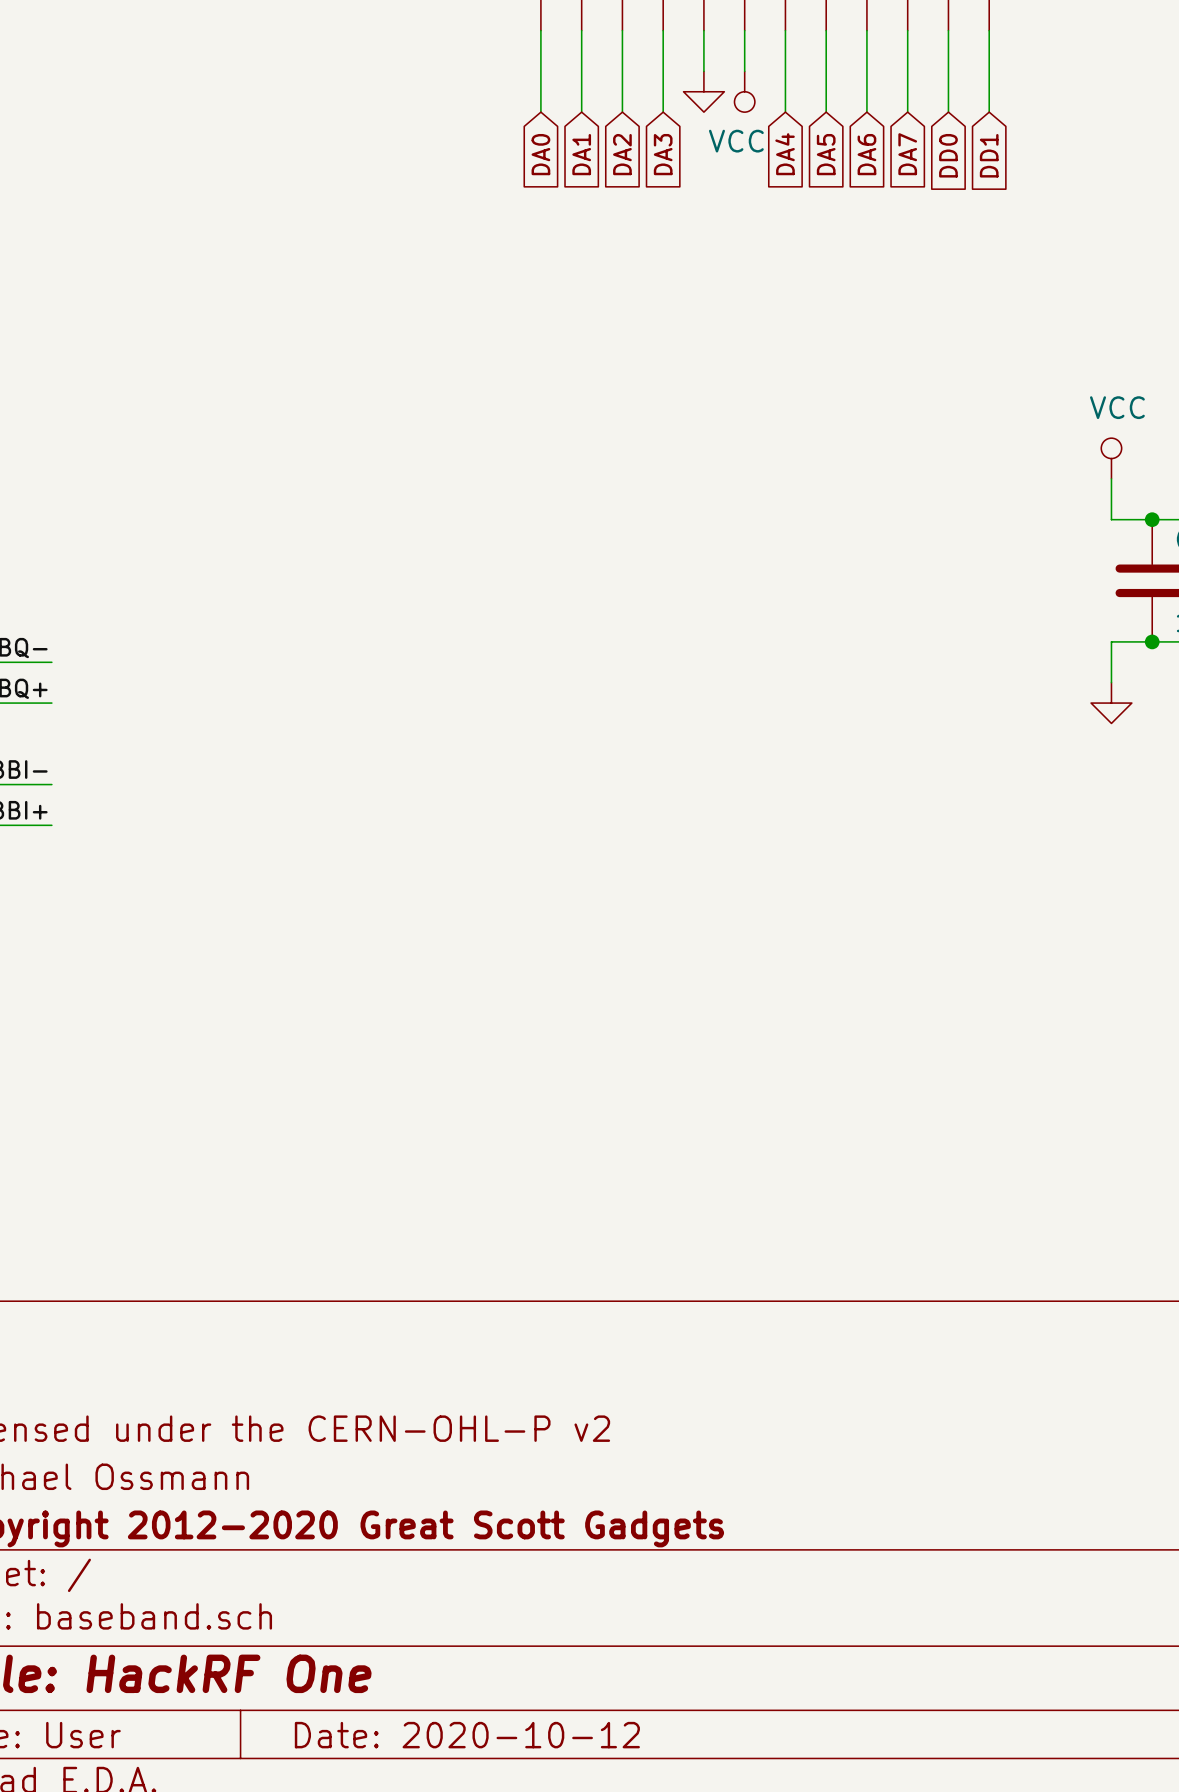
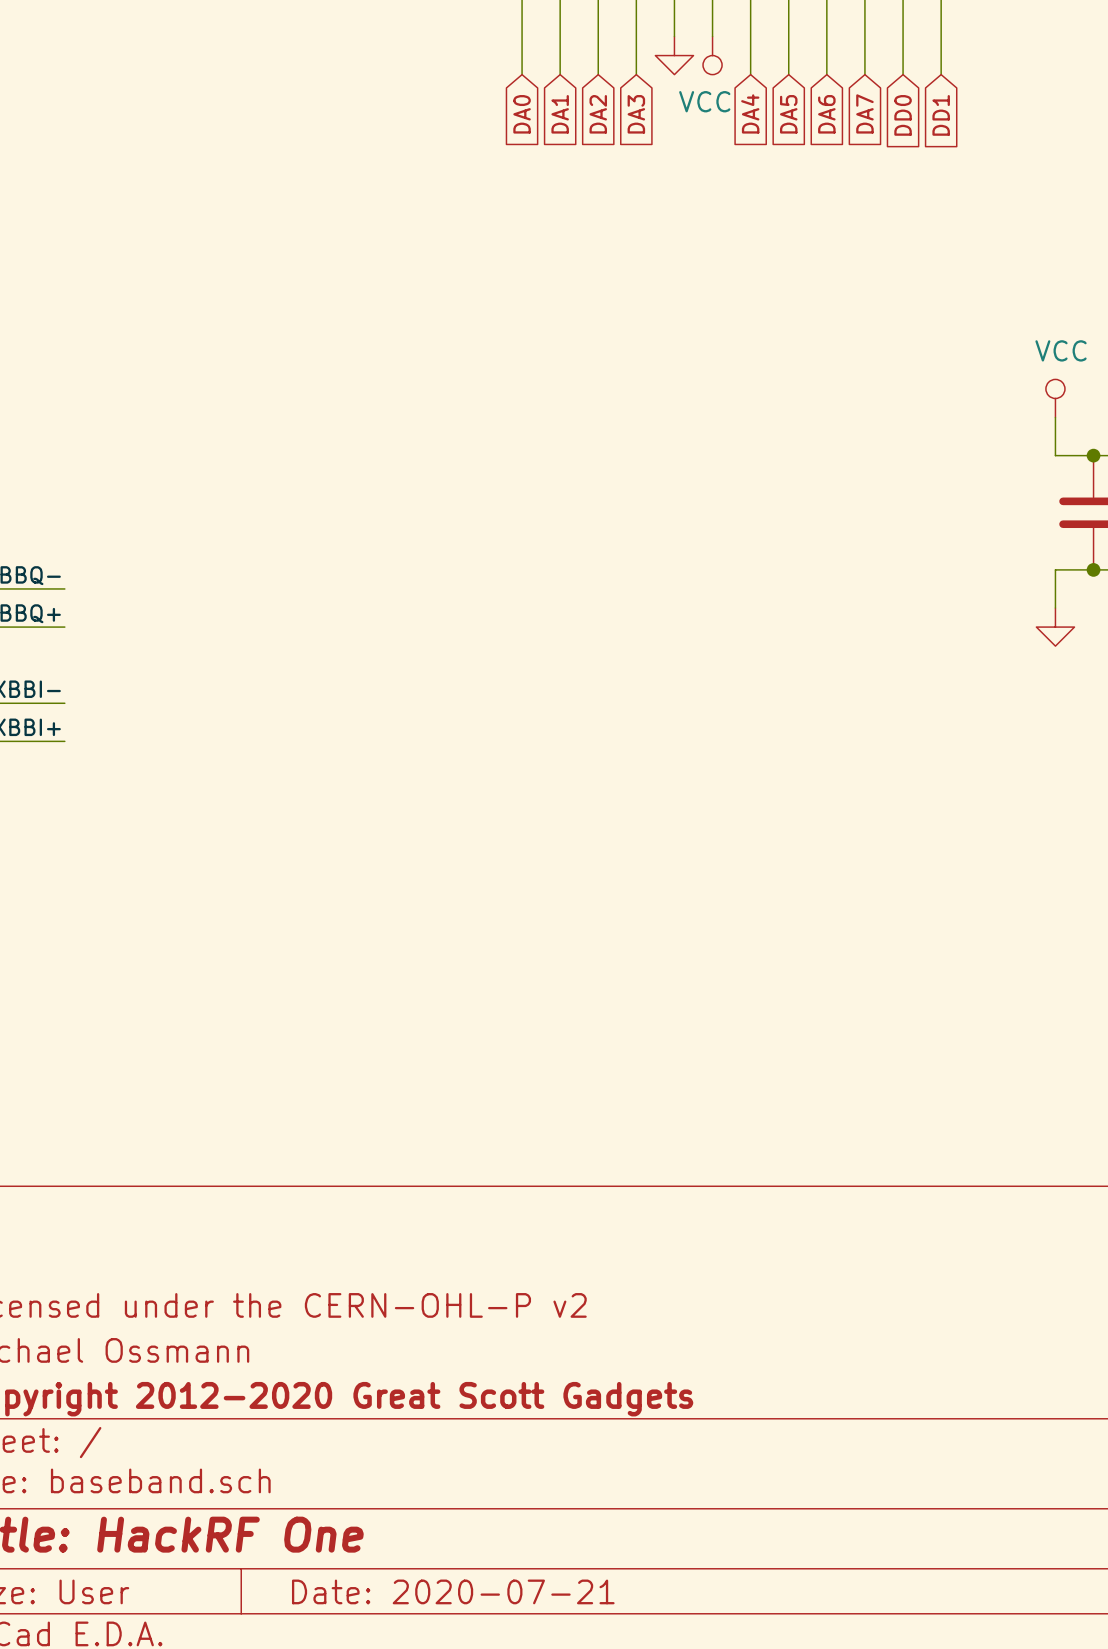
title block: Date: 2020-10-12 (467, 1735) -> Date: 2020-07-21 (453, 1591)

